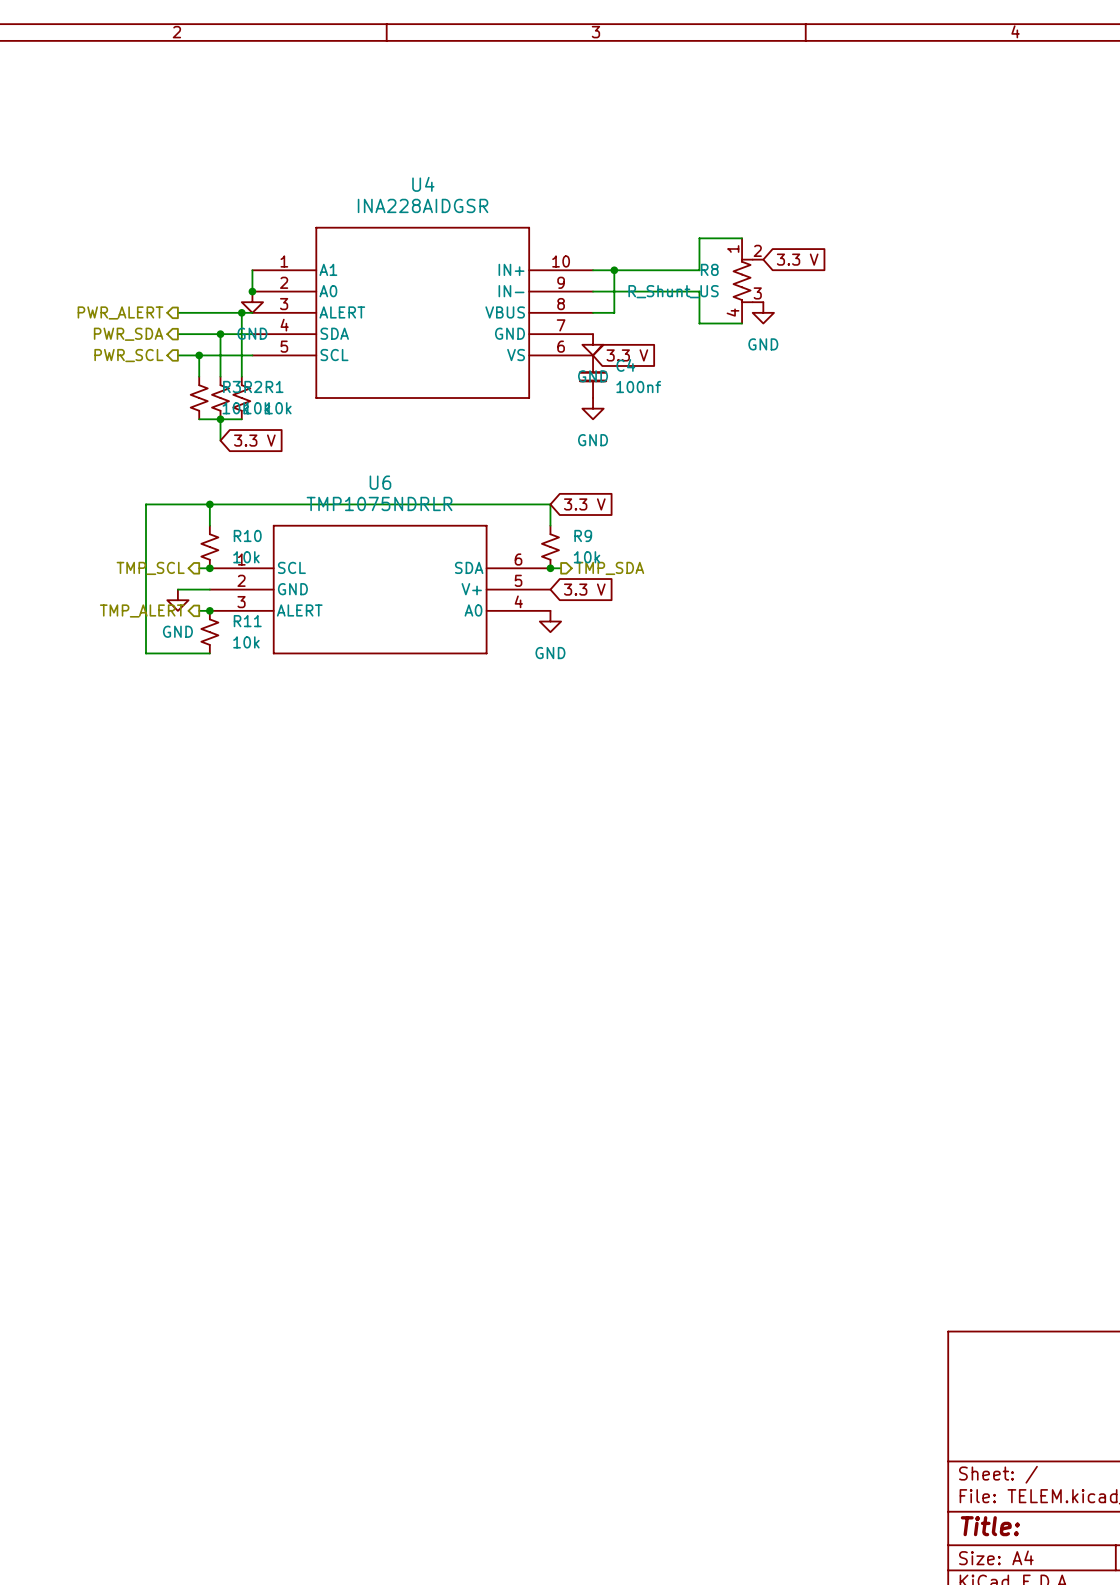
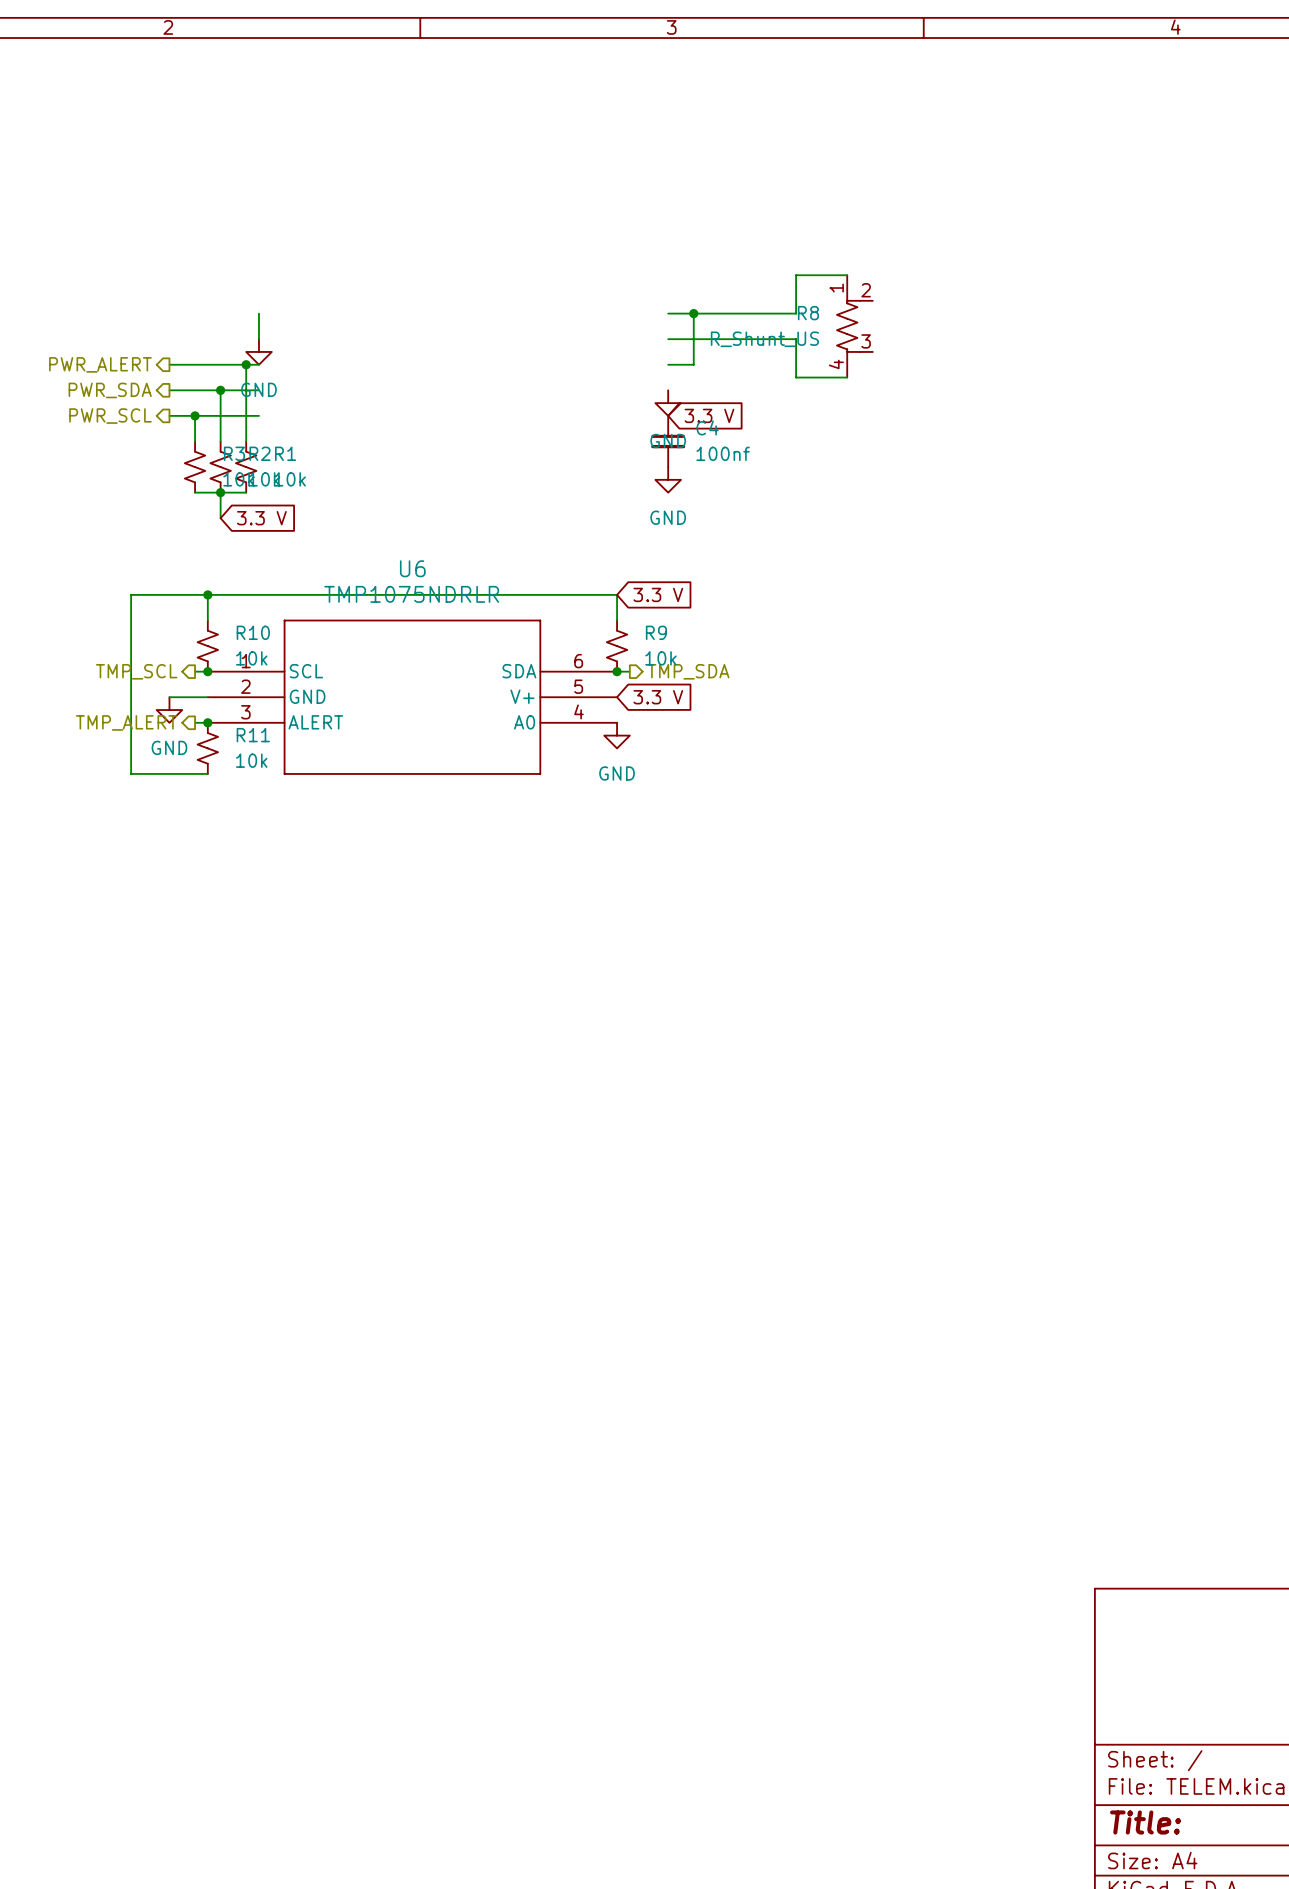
global label: 3.3 V (797, 259) -> none
junction: (252, 291) -> none
U4: INA228AIDGSR (422, 312) -> none
power symbol: GND (763, 312) -> none

